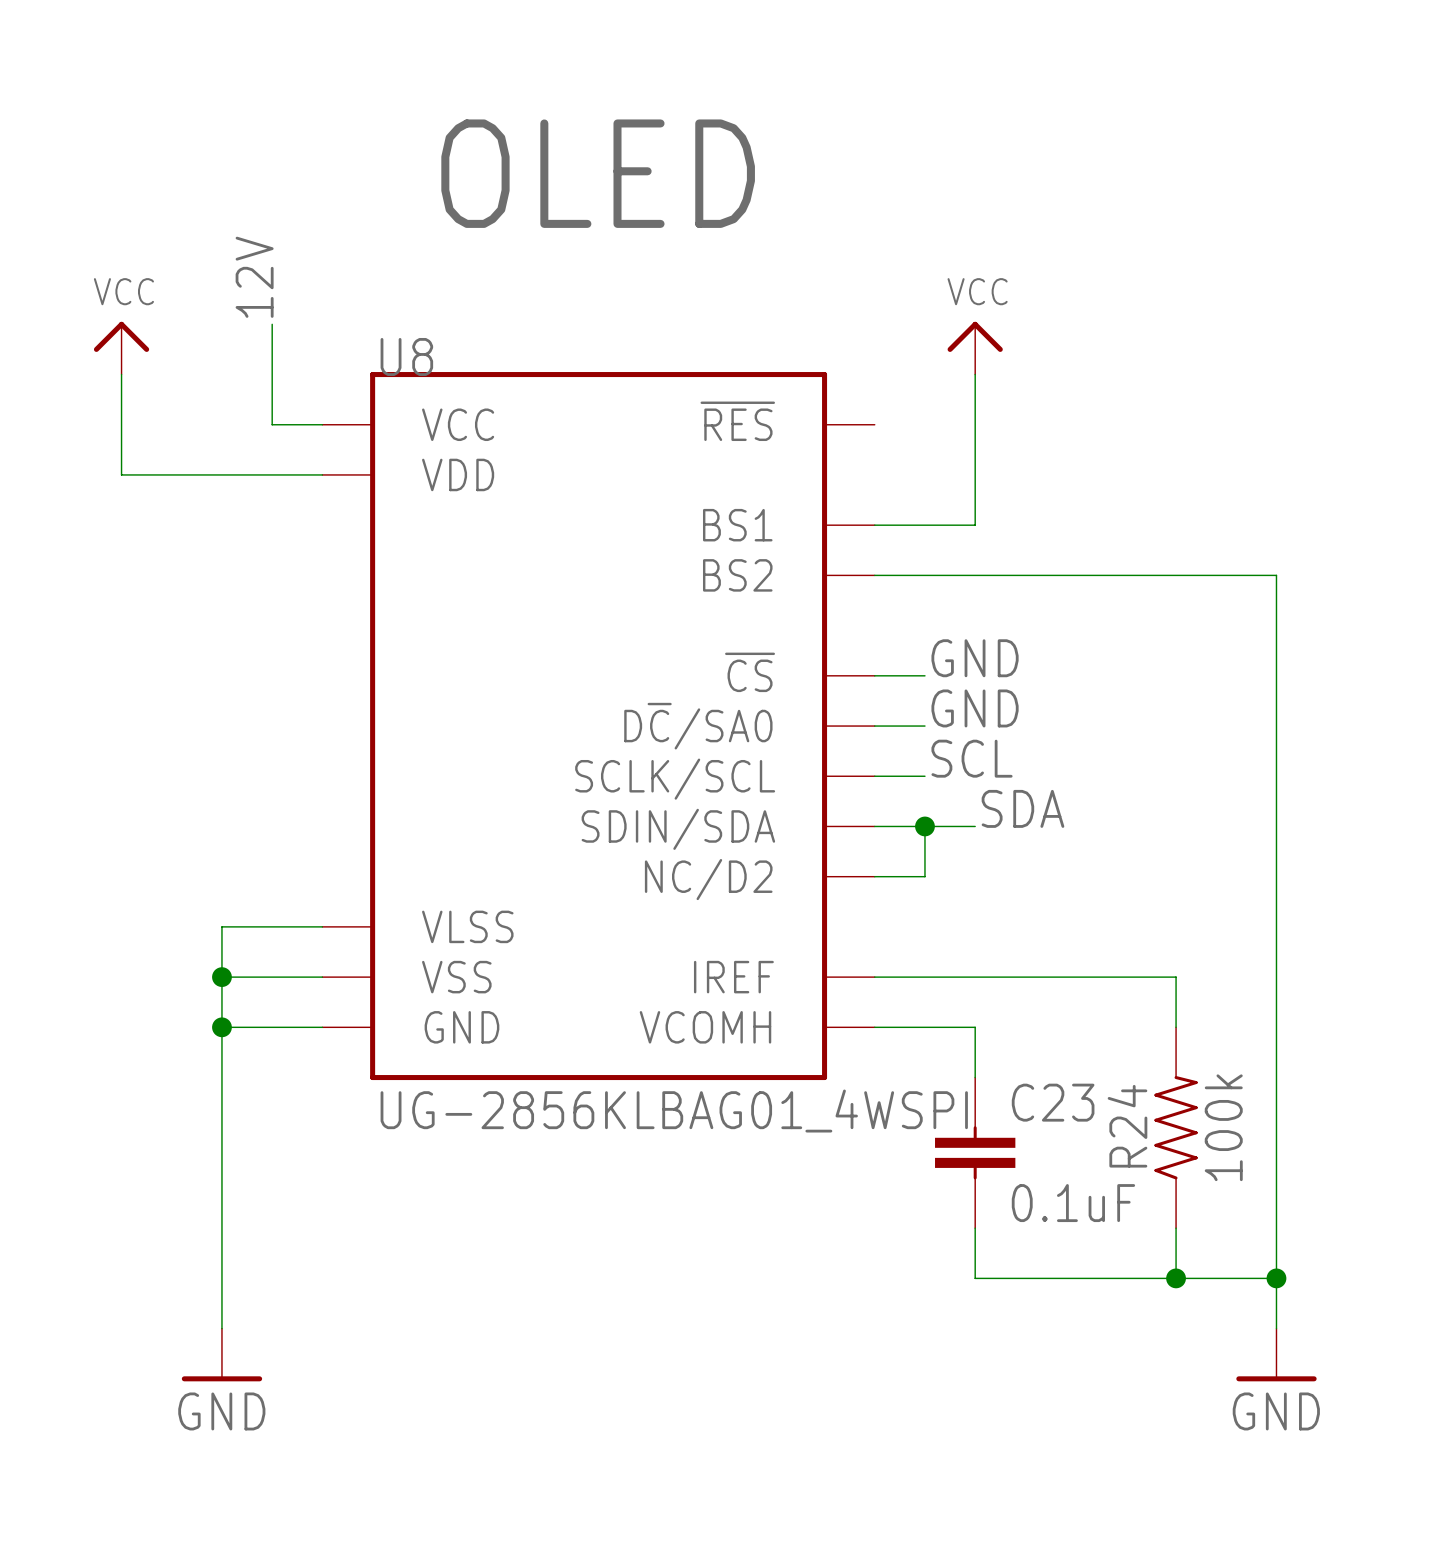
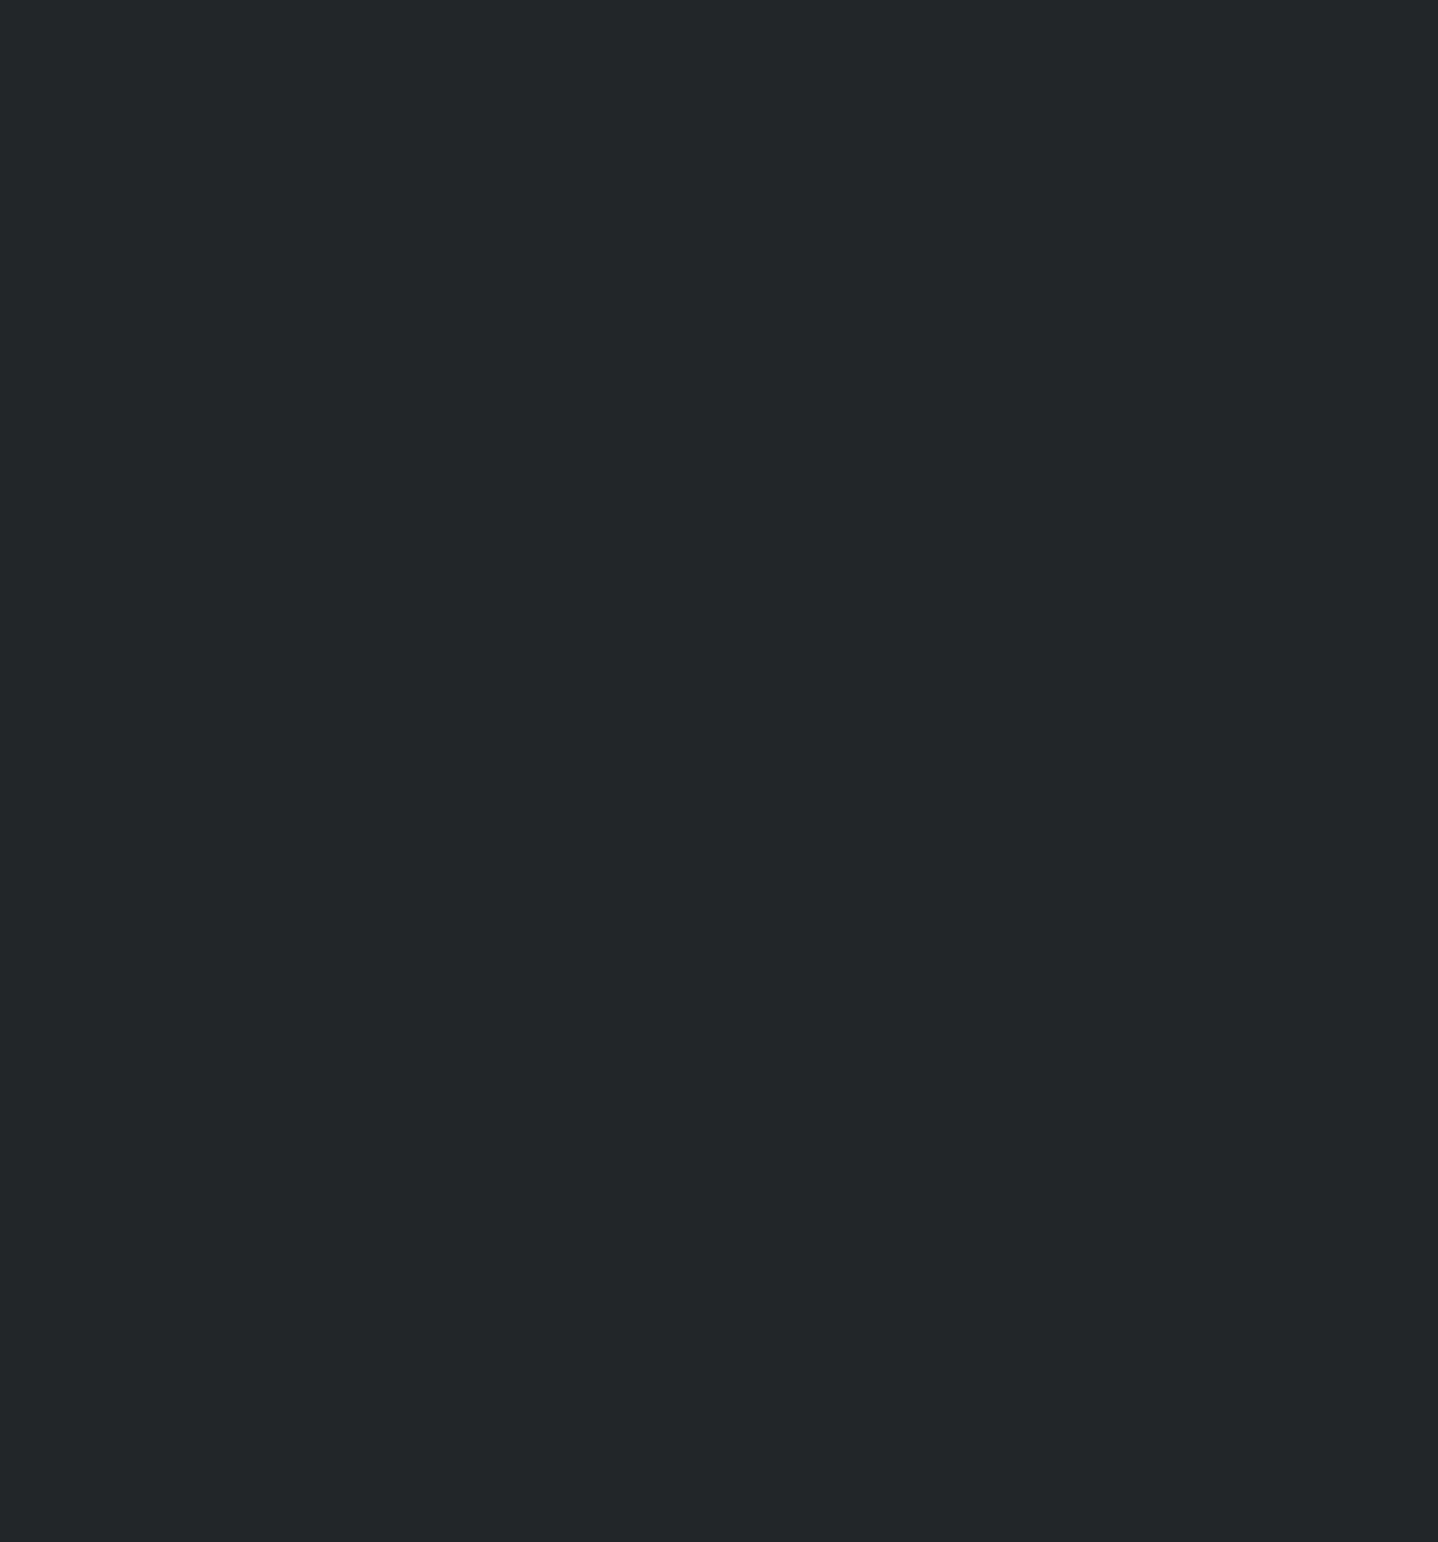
text: OLED (598, 173) -> none
label: 12V (254, 277) -> none
wire: (272, 324) (272, 424) (322, 424) -> none
power symbol: VCC (121, 348) -> none
power symbol: VCC (975, 348) -> none
wire: (121, 374) (121, 474) (322, 474) -> none
wire: (975, 374) (975, 525) (874, 525) -> none
wire: (874, 575) (1276, 575) (1276, 1328) -> none
label: GND (975, 658) -> none
wire: (874, 675) (924, 675) -> none
label: GND (975, 708) -> none
U8: UG-2856KLBAG01_4WSPI (598, 726) -> none
wire: (874, 726) (924, 726) -> none
label: SCL (972, 758) -> none
wire: (874, 776) (924, 776) -> none
label: SDA (1022, 808) -> none
wire: (874, 826) (975, 826) -> none
wire: (924, 826) (924, 876) (874, 876) -> none
junction: (924, 826) -> none
wire: (322, 926) (221, 926) (221, 1328) -> none
wire: (221, 977) (322, 977) -> none
junction: (221, 977) -> none
wire: (874, 977) (1176, 977) (1176, 1027) -> none
wire: (221, 1027) (322, 1027) -> none
junction: (221, 1027) -> none
wire: (874, 1027) (975, 1027) (975, 1077) -> none
R24: 100k (1176, 1127) -> none
C23: 0.1uF (975, 1152) -> none
wire: (975, 1228) (975, 1278) (1276, 1278) -> none
wire: (1176, 1228) (1176, 1278) -> none
junction: (1176, 1278) -> none
junction: (1276, 1278) -> none
power symbol: GND (221, 1354) -> none
power symbol: GND (1276, 1354) -> none

